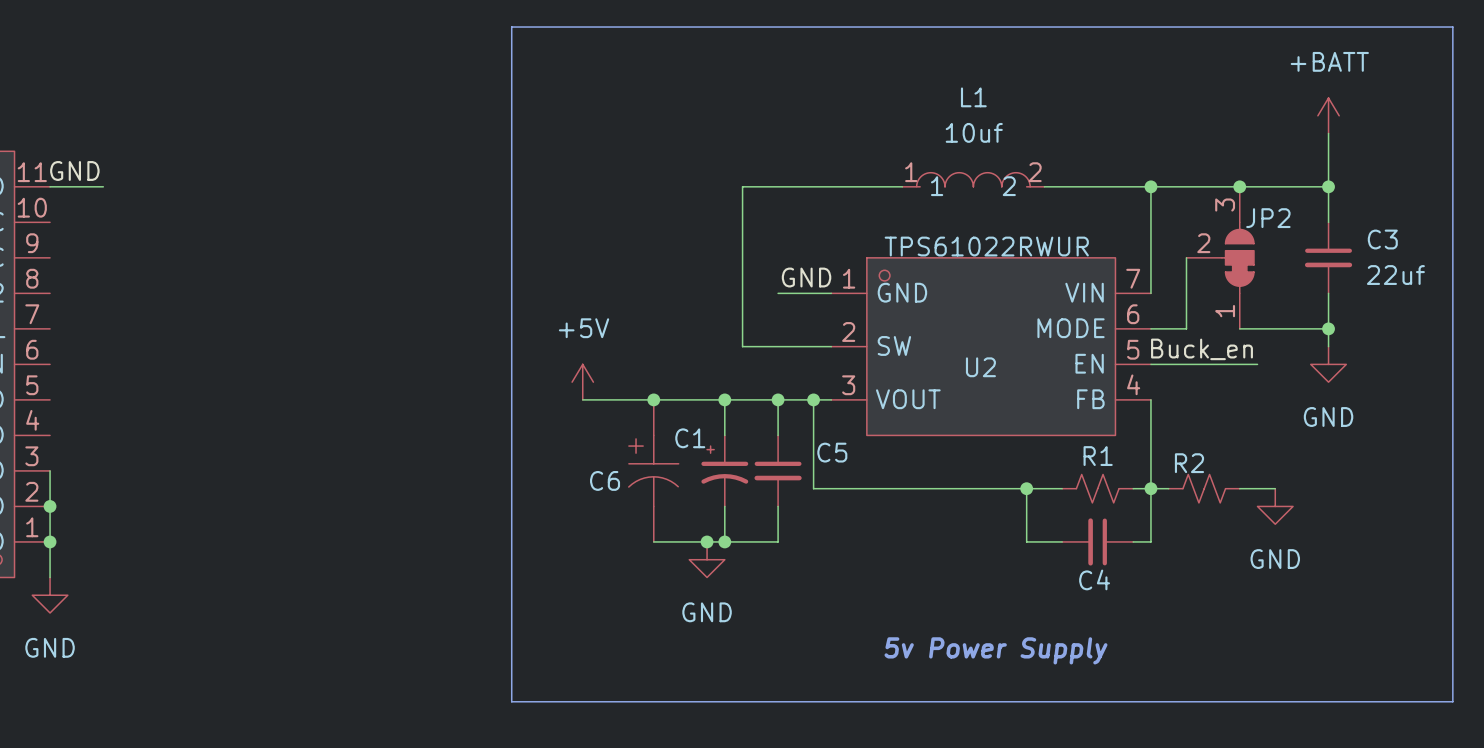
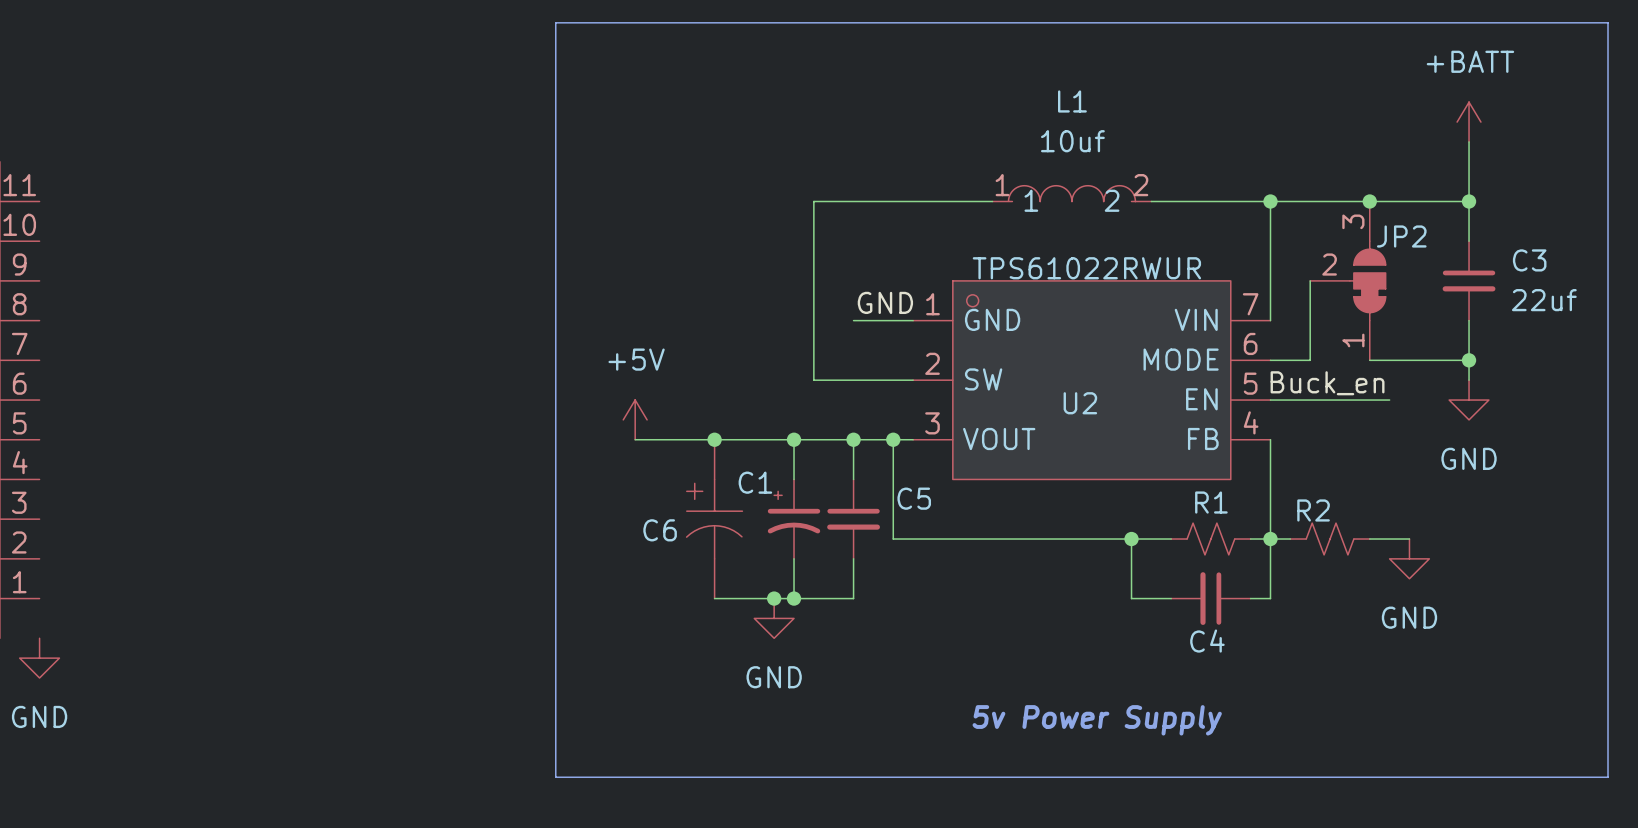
label: GND (74, 170) -> none
wire: (50, 186) (103, 186) -> none
wire: (50, 470) (50, 577) -> none
junction: (50, 506) -> none
junction: (50, 541) -> none

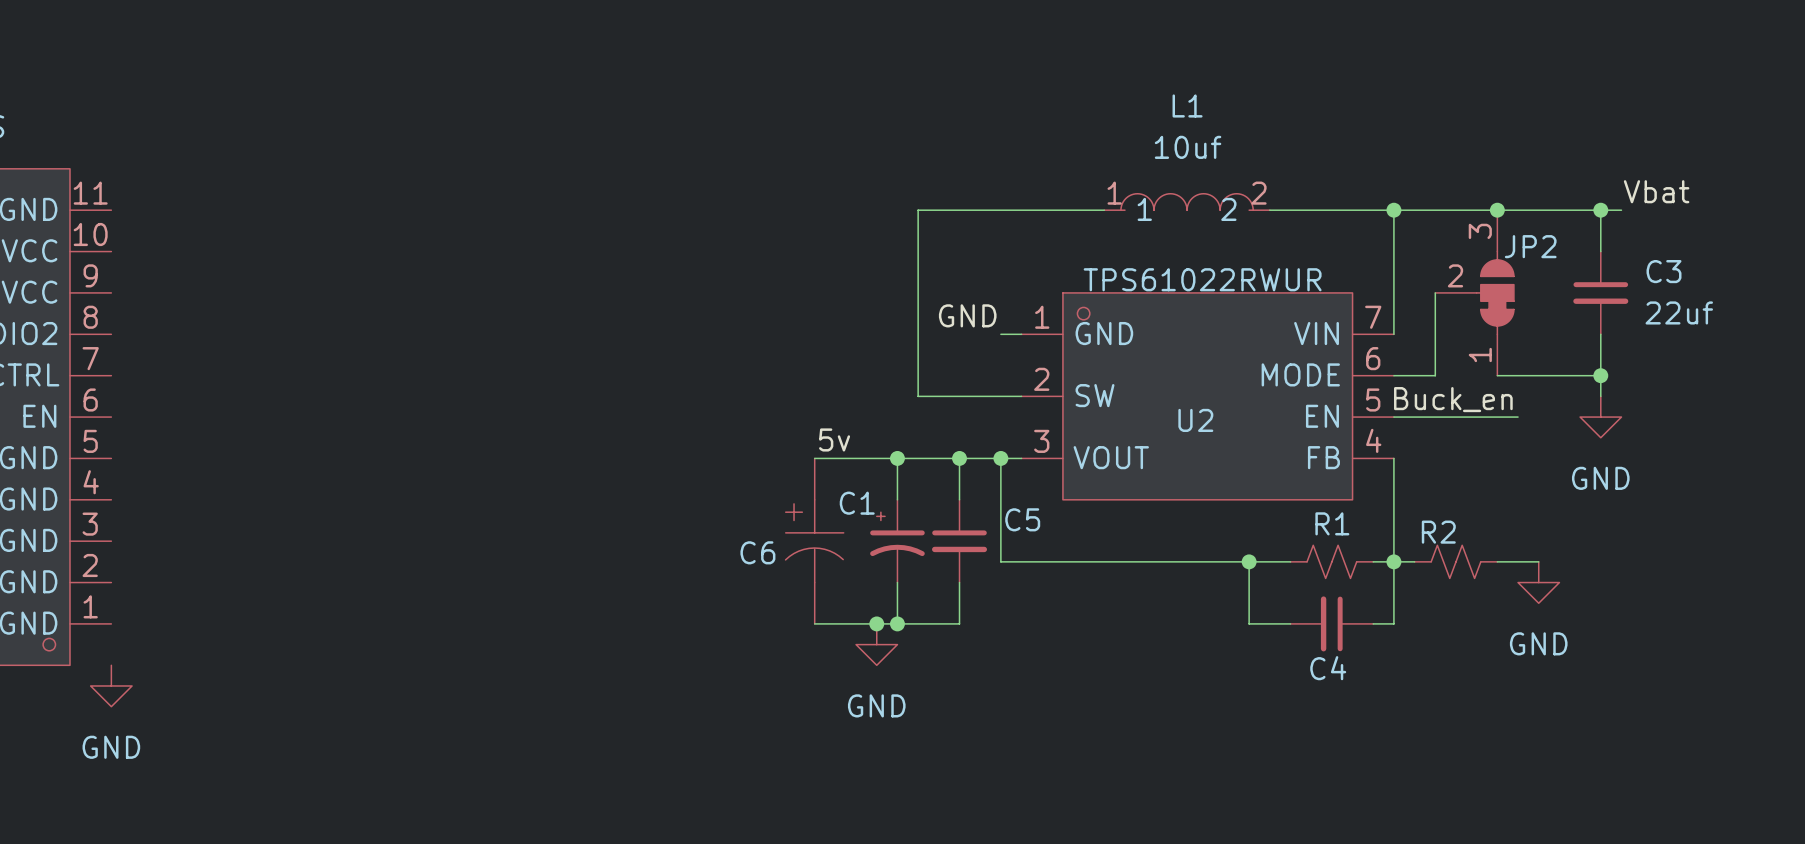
line: (555, 22) (1608, 22) (1608, 777) (555, 777) (555, 22) -> none
power symbol: +BATT (1469, 122) -> none
wire: (1469, 141) (1469, 201) -> (1621, 210) (1600, 210)
label: none -> Vbat (1656, 191)
label position: GND (885, 302) -> GND (967, 315)
wire: (853, 320) (893, 320) -> none
power symbol: +5V (635, 419) -> none
label: none -> 5v (834, 439)
wire: (635, 439) (714, 439) -> none
junction: (714, 439) -> none
text: 5v Power Supply (1097, 720) -> none

